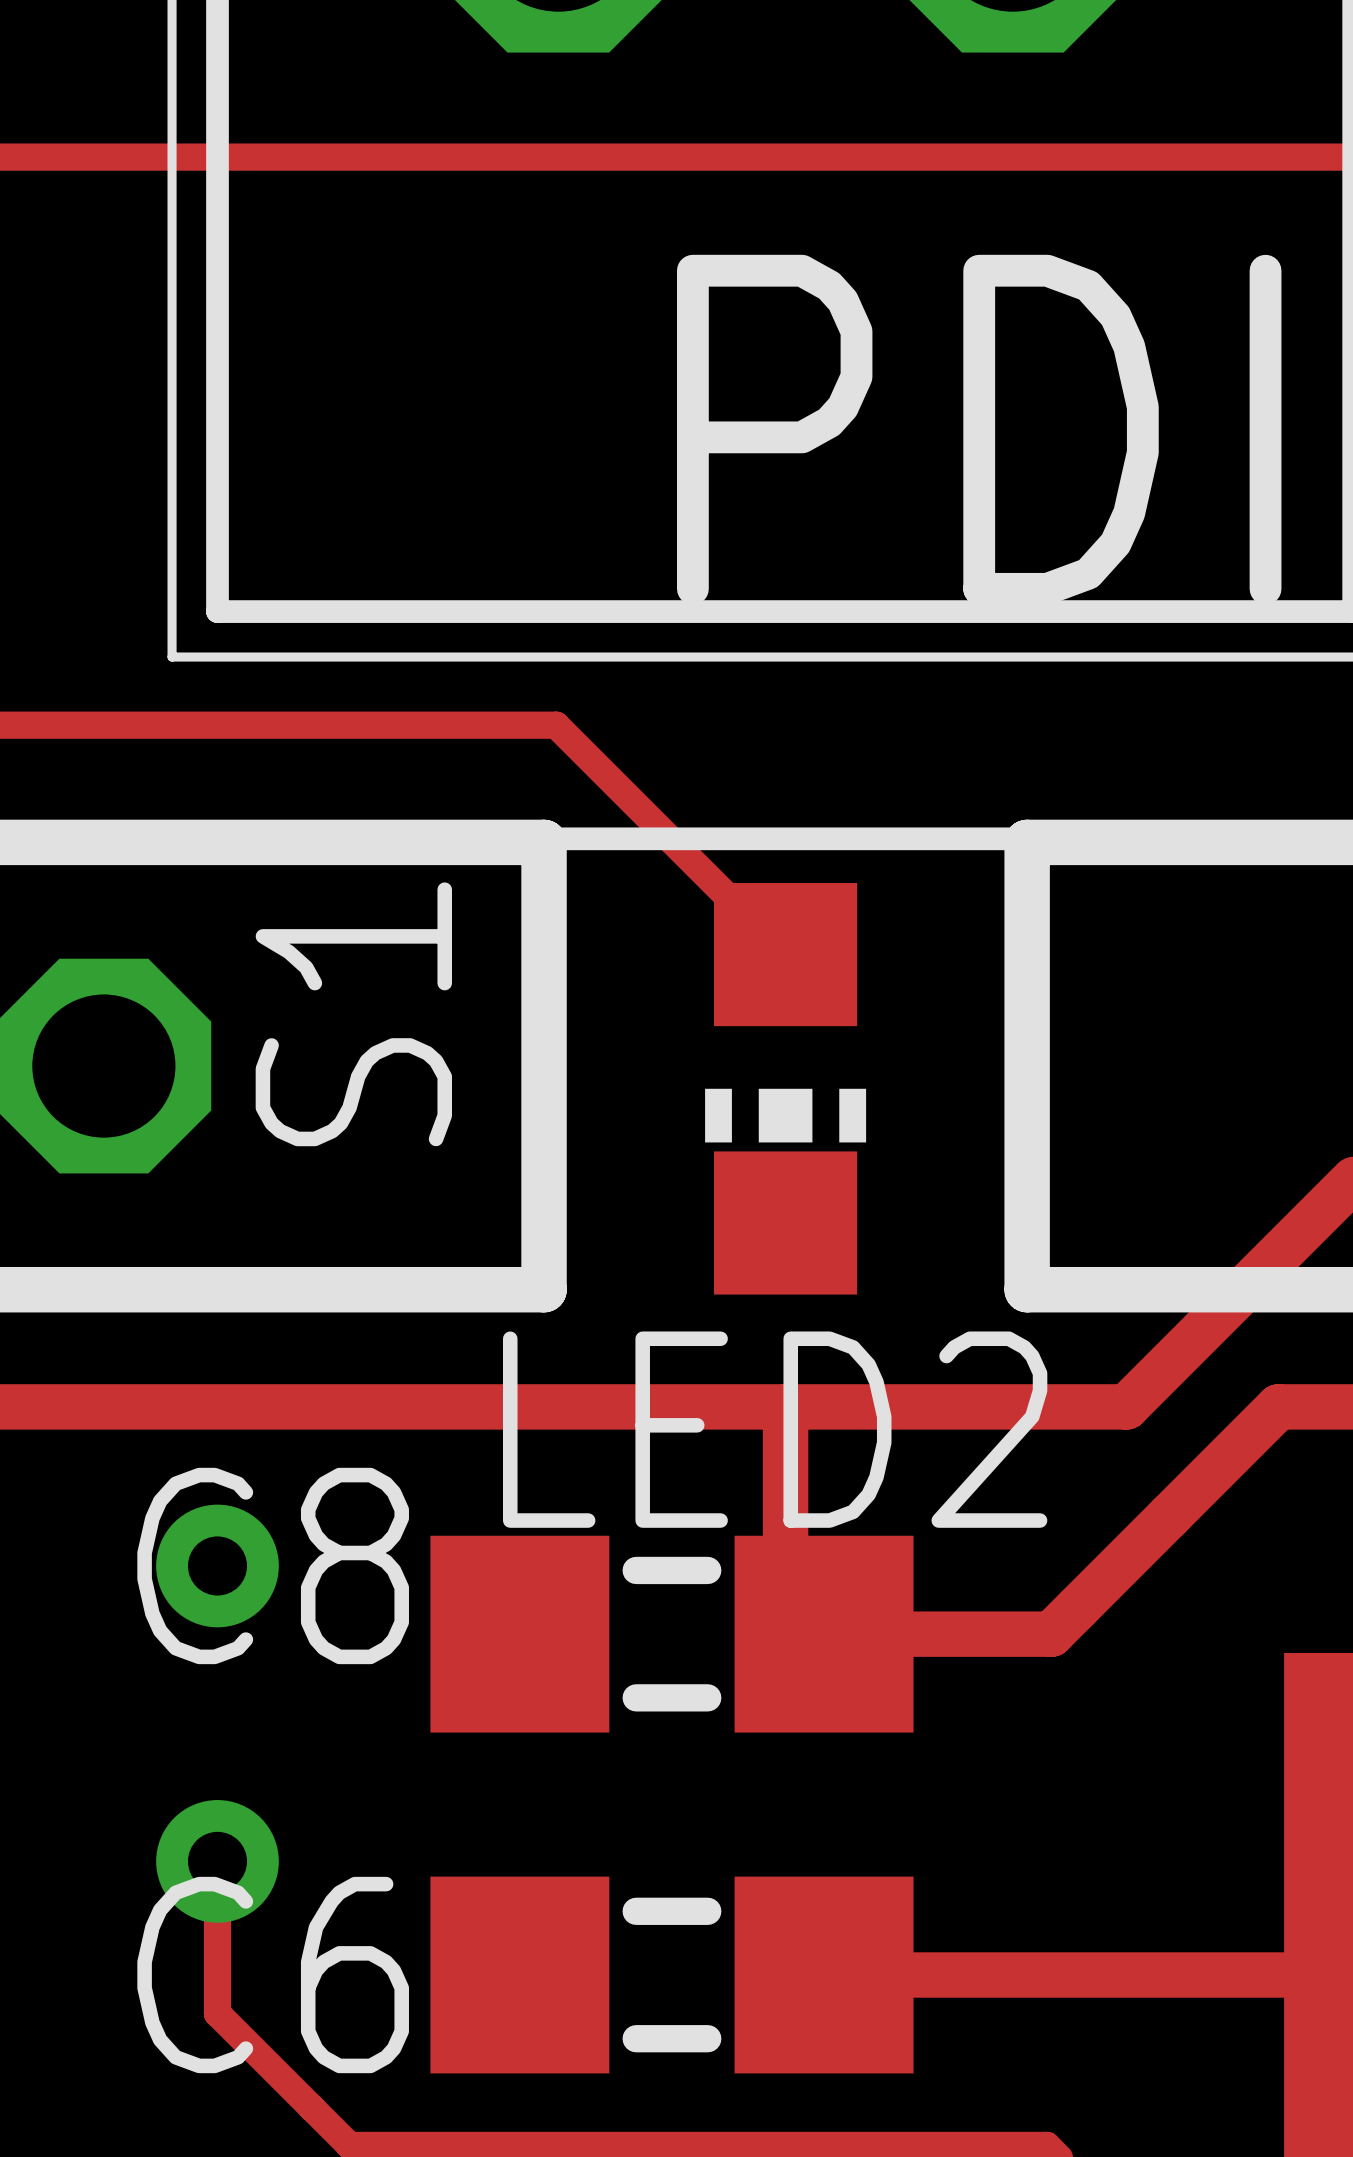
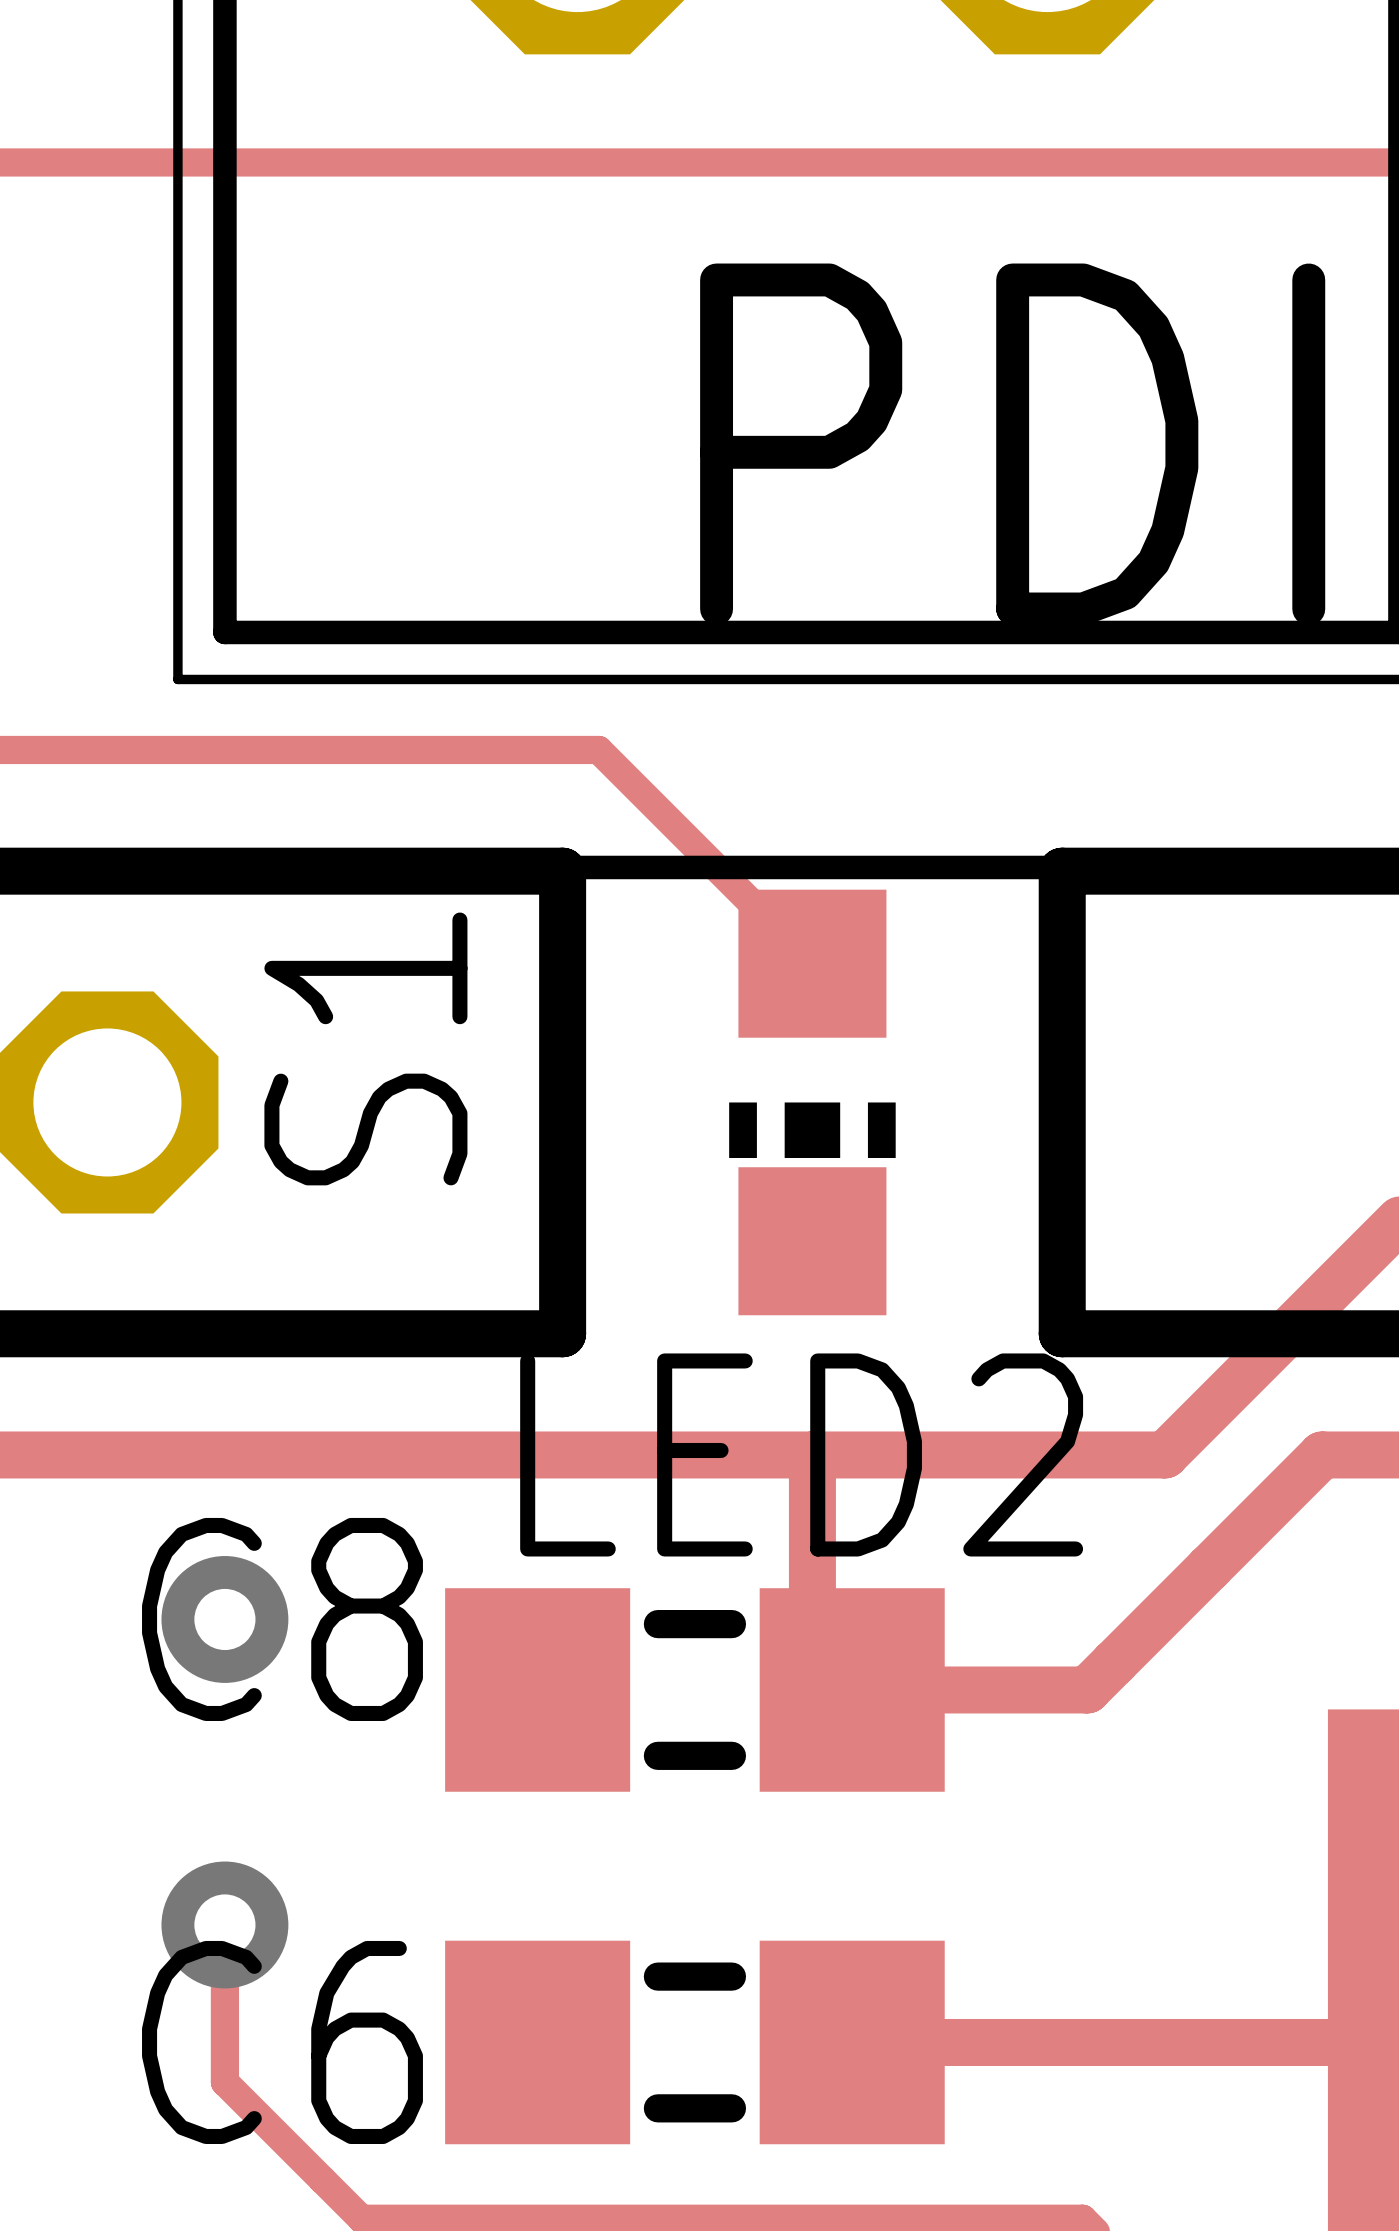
track: (556, 725) (785, 954) -> (575, 749) (598, 749) (812, 963)
LED2 position: (785, 1088) -> (812, 1102)

